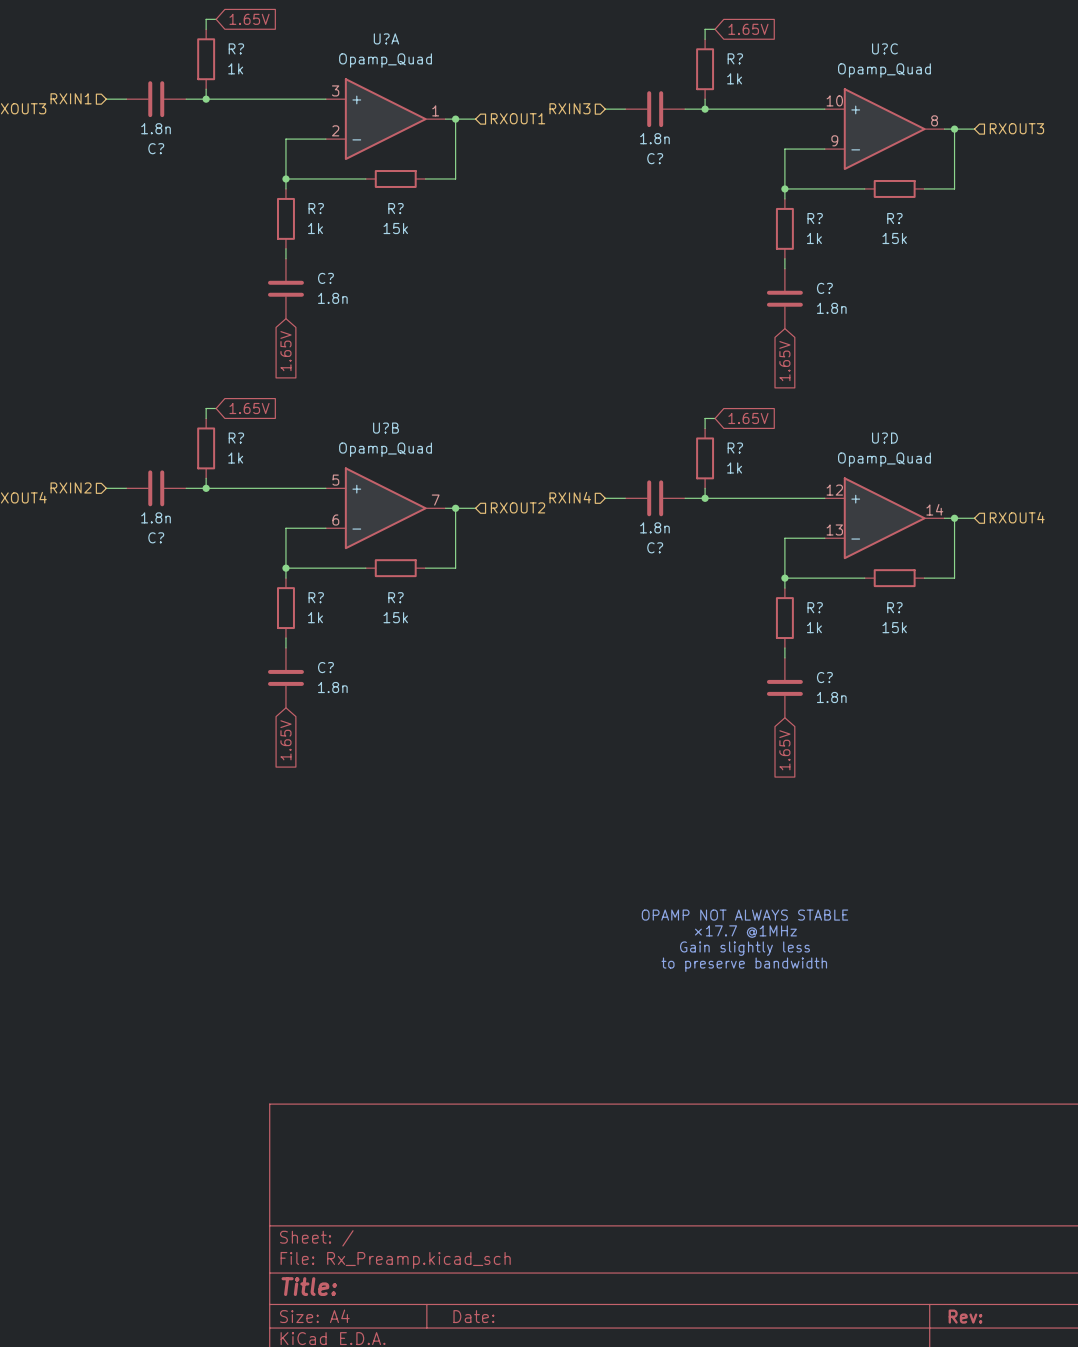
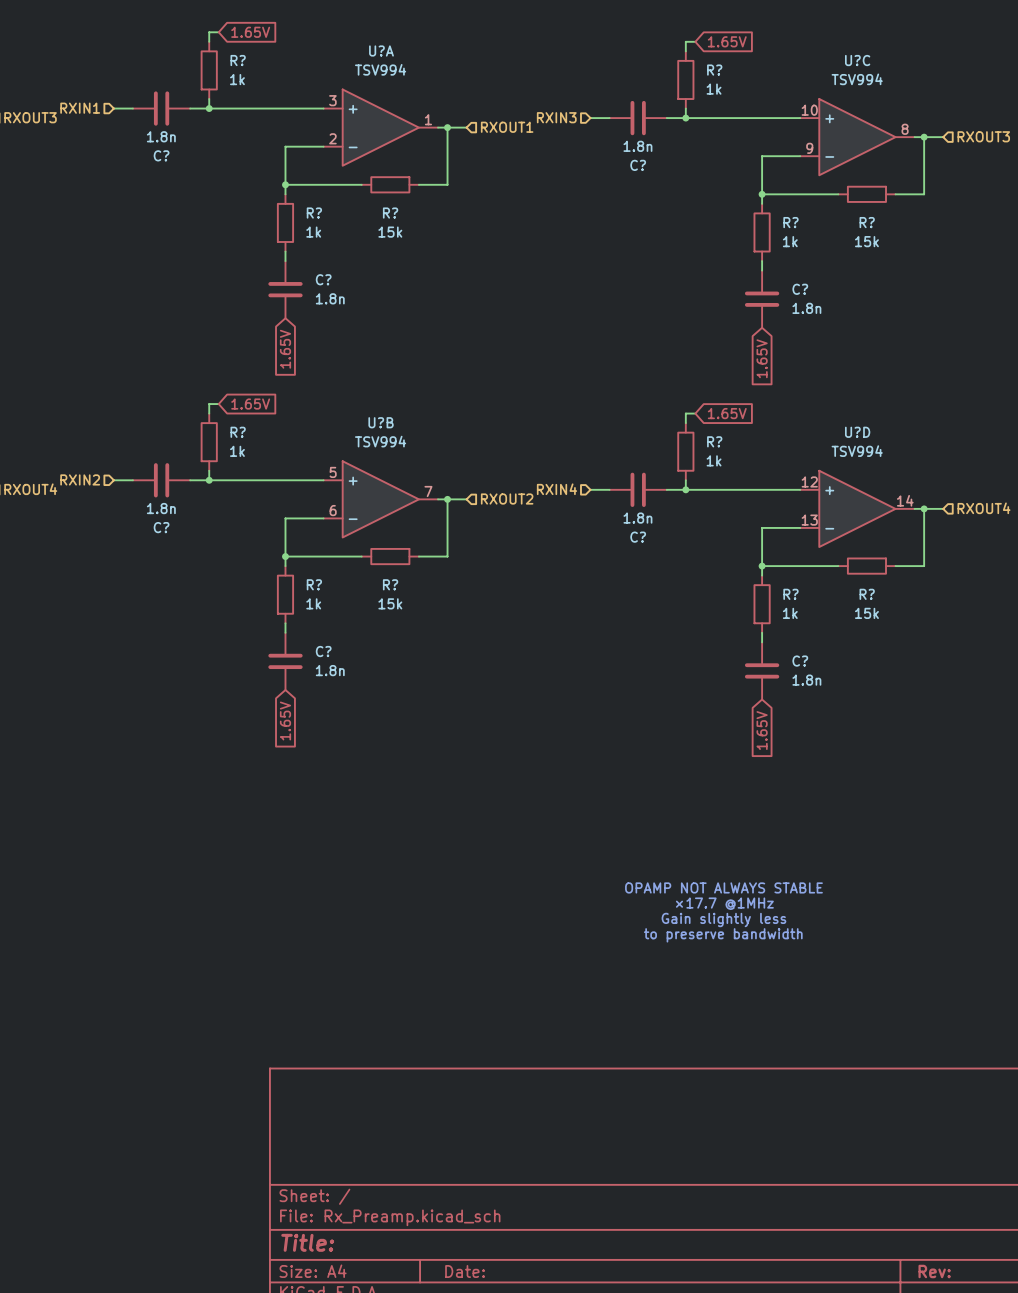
U?A value: Opamp_Quad (385, 60) -> TSV994 (380, 69)
U?C value: Opamp_Quad (884, 70) -> TSV994 (857, 79)
U?B value: Opamp_Quad (385, 449) -> TSV994 (380, 441)
U?D value: Opamp_Quad (884, 459) -> TSV994 (857, 451)

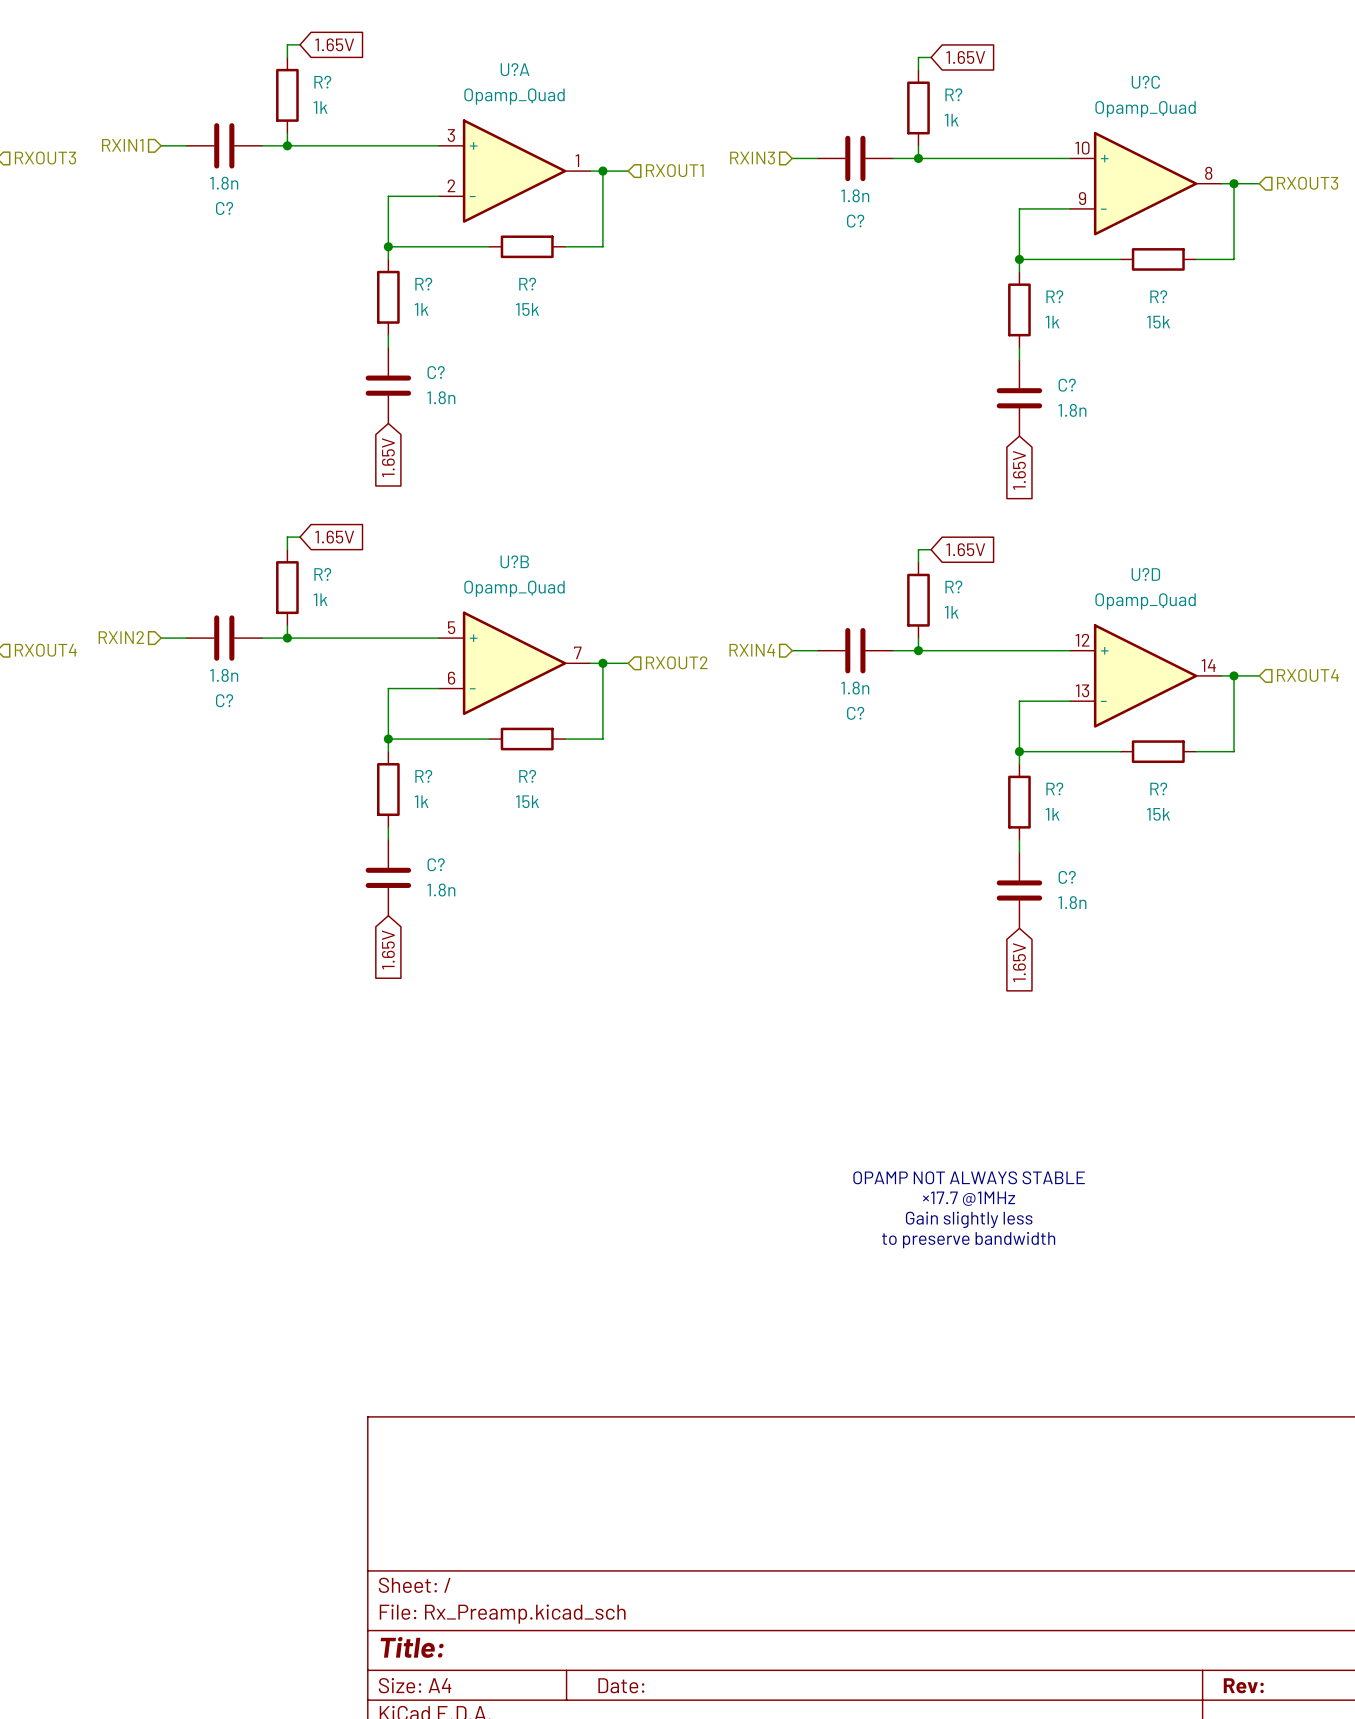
U?A value: TSV994 (380, 69) -> Opamp_Quad (514, 96)
U?C value: TSV994 (857, 79) -> Opamp_Quad (1145, 109)
U?B value: TSV994 (380, 441) -> Opamp_Quad (514, 588)
U?D value: TSV994 (857, 451) -> Opamp_Quad (1145, 601)

